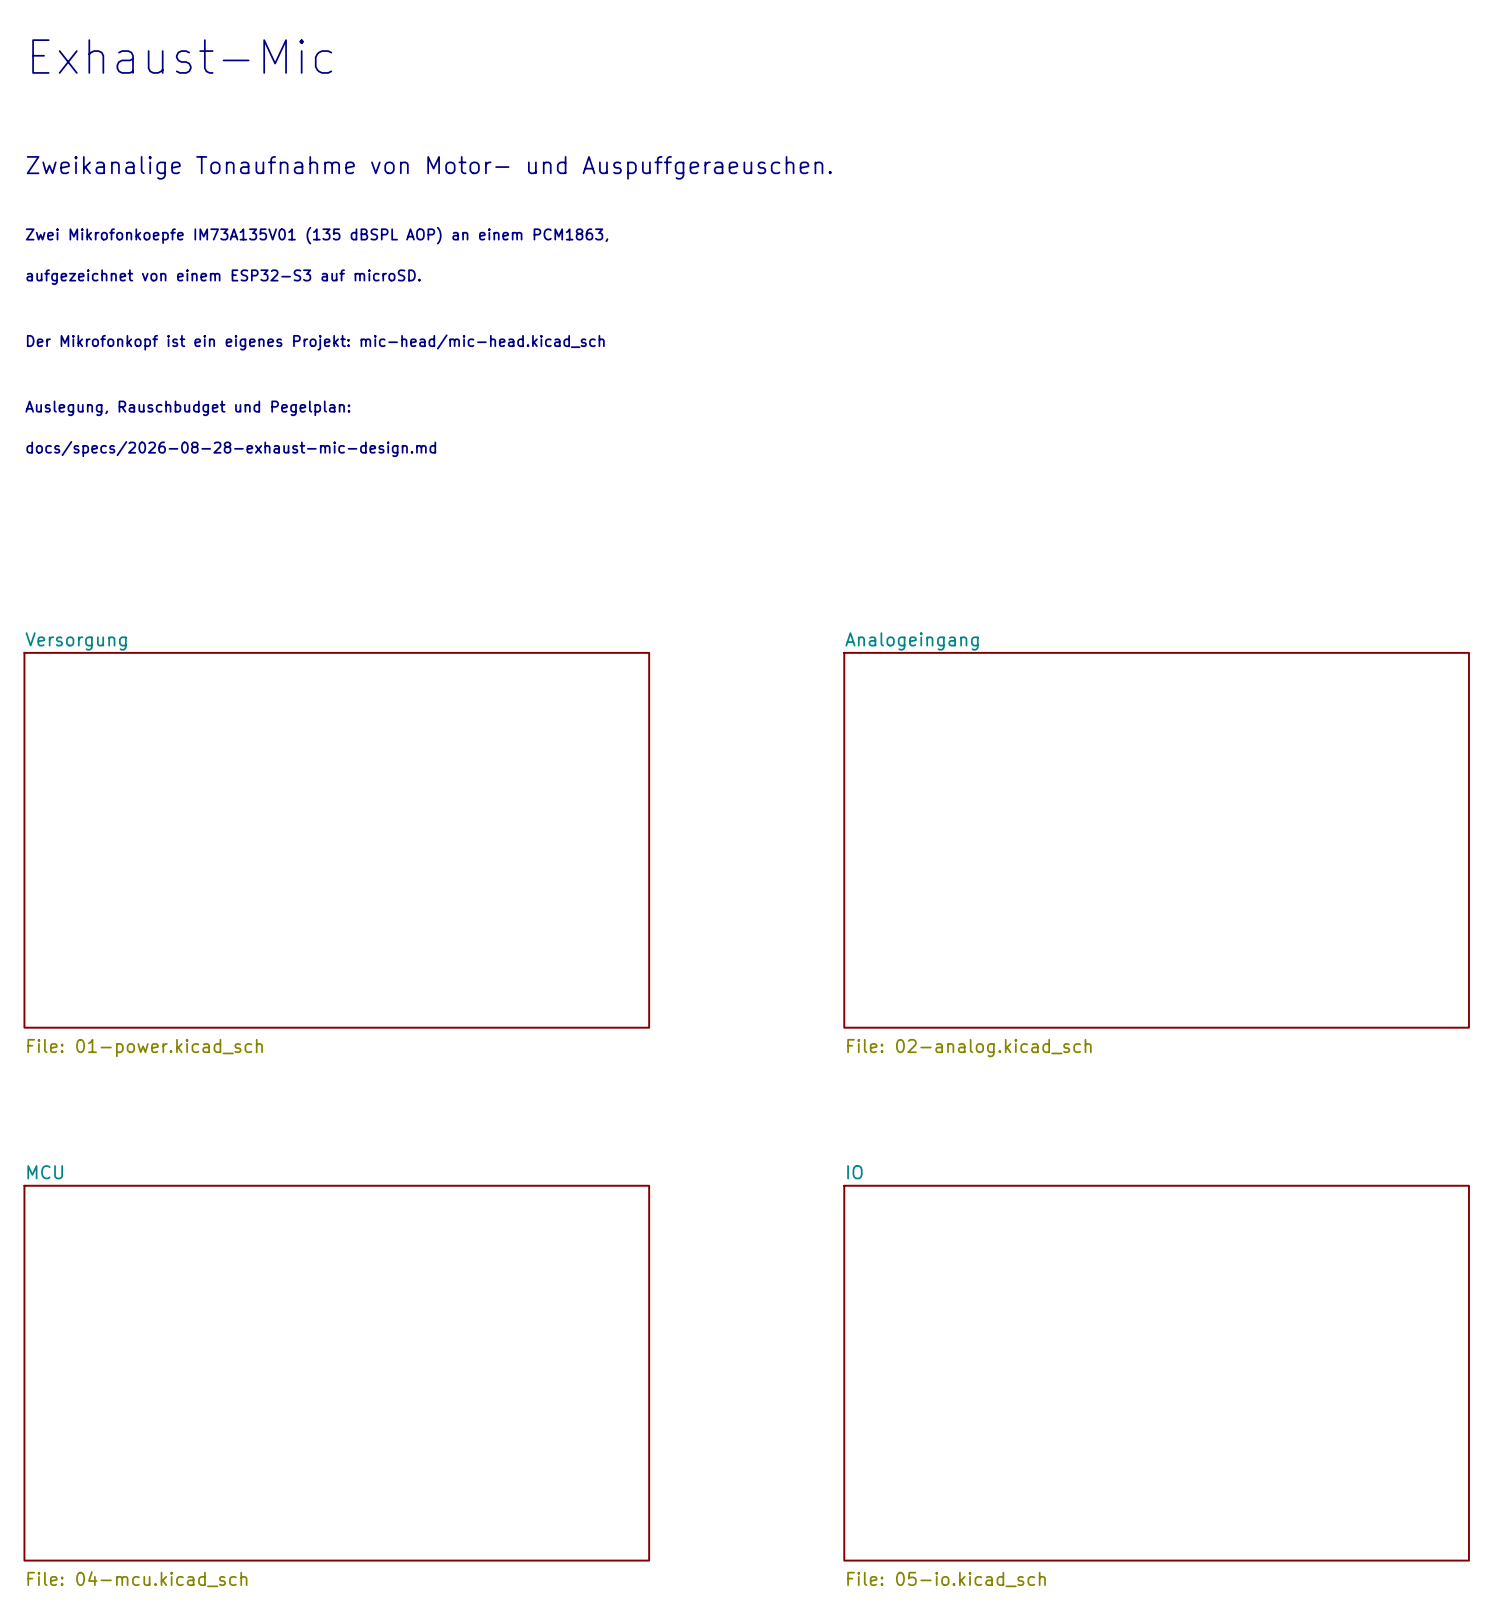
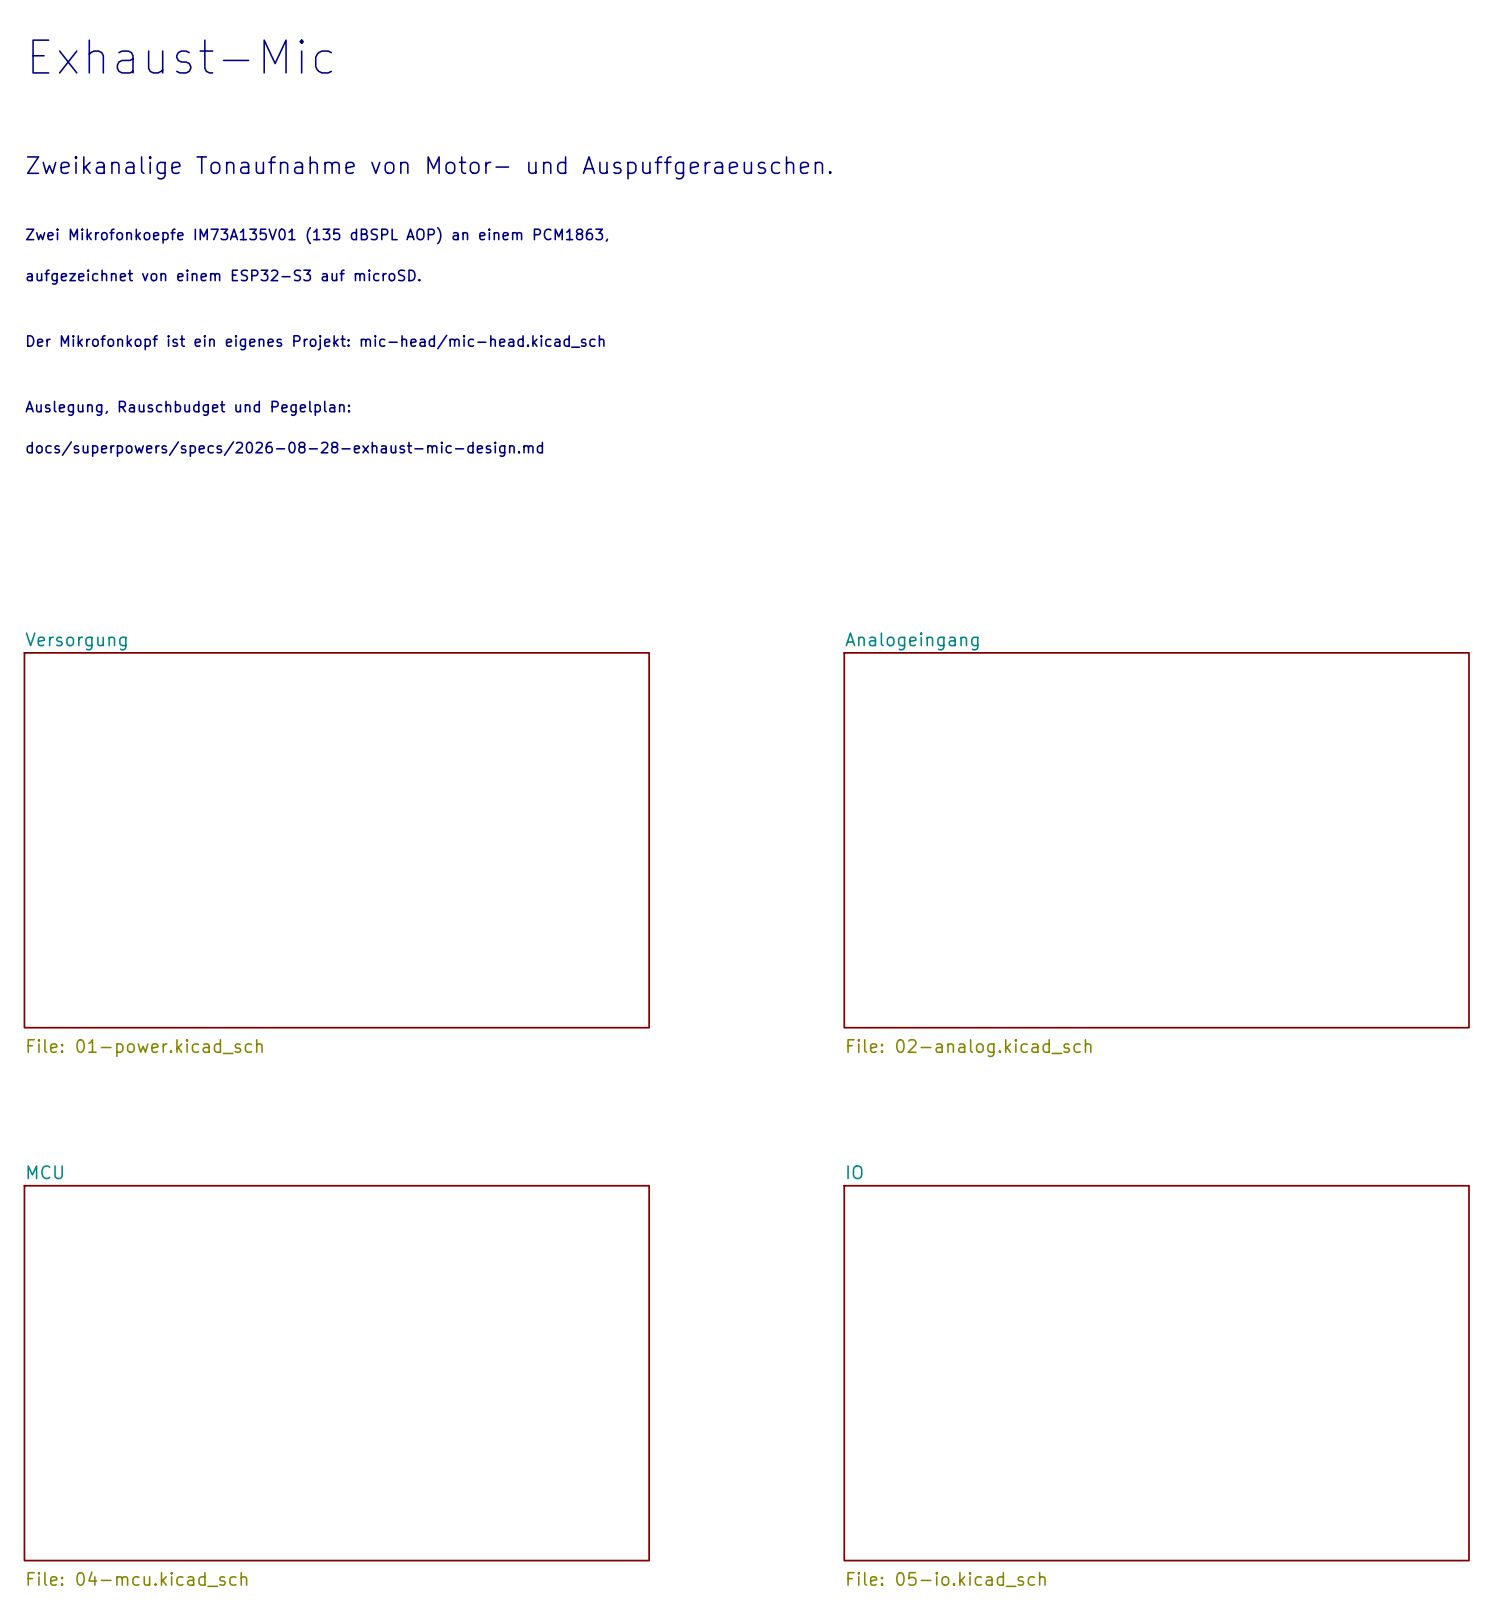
text: docs/specs/2026-08-28-exhaust-mic-design.md (231, 449) -> docs/superpowers/specs/2026-08-28-exhaust-mic-design.md (284, 449)

